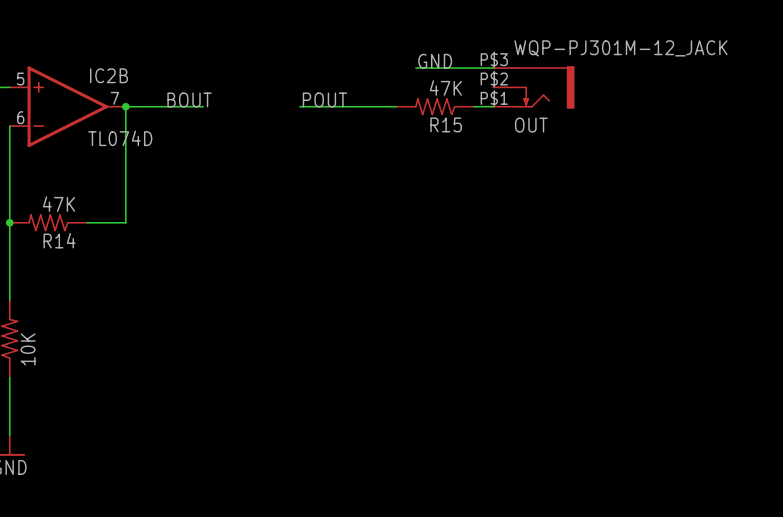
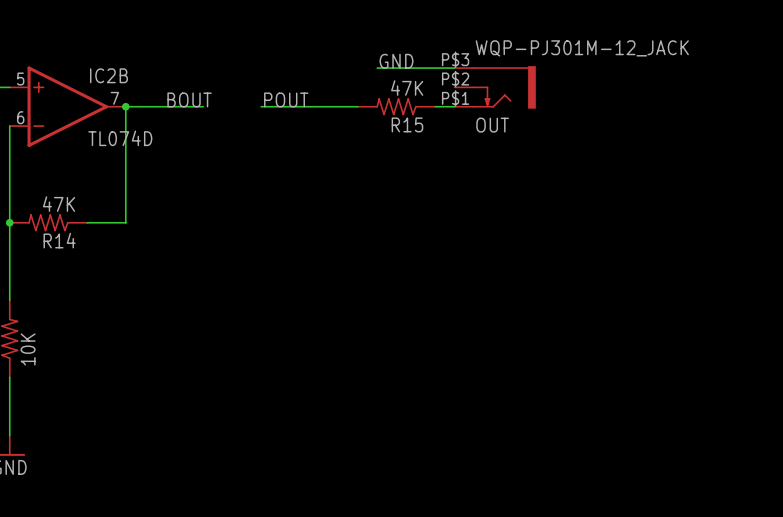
label position: GND (435, 61) -> GND (396, 61)
OUT position: (533, 87) -> (495, 87)
label position: POUT (324, 99) -> POUT (286, 99)
wire: none -> (261, 106) (299, 106)
R15 position: (435, 106) -> (396, 106)

